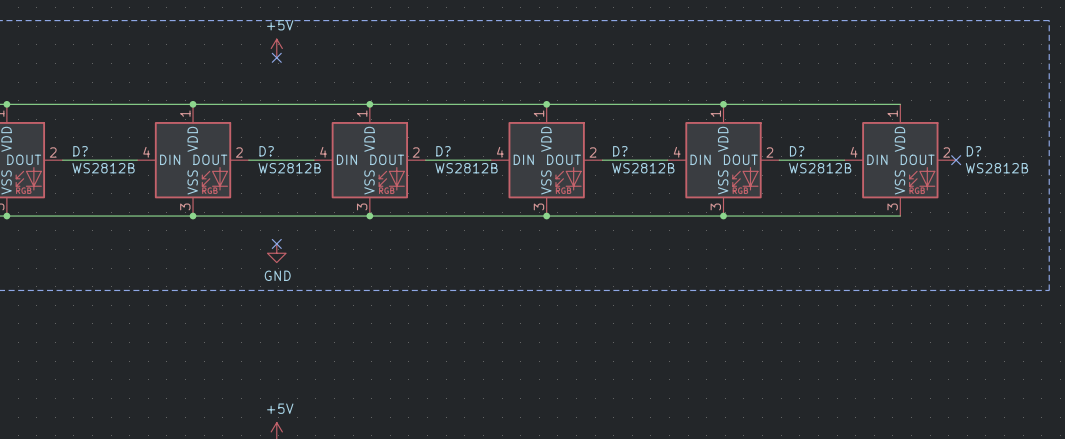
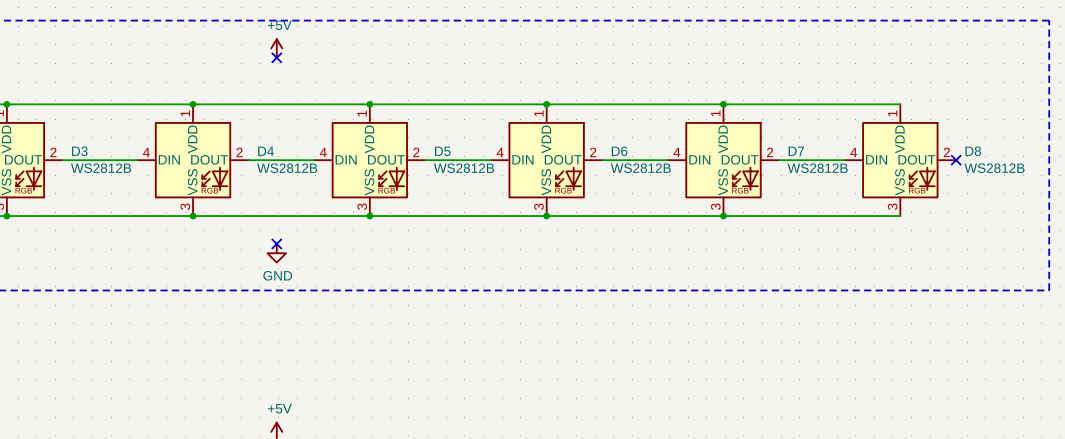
D? name: D? (80, 151) -> D3 (79, 151)
D? name: D? (266, 151) -> D4 (266, 151)
D? name: D? (443, 151) -> D5 (442, 151)
D? name: D? (620, 151) -> D6 (619, 151)
D? name: D? (797, 151) -> D7 (796, 151)
D? name: D? (973, 151) -> D8 (973, 151)

